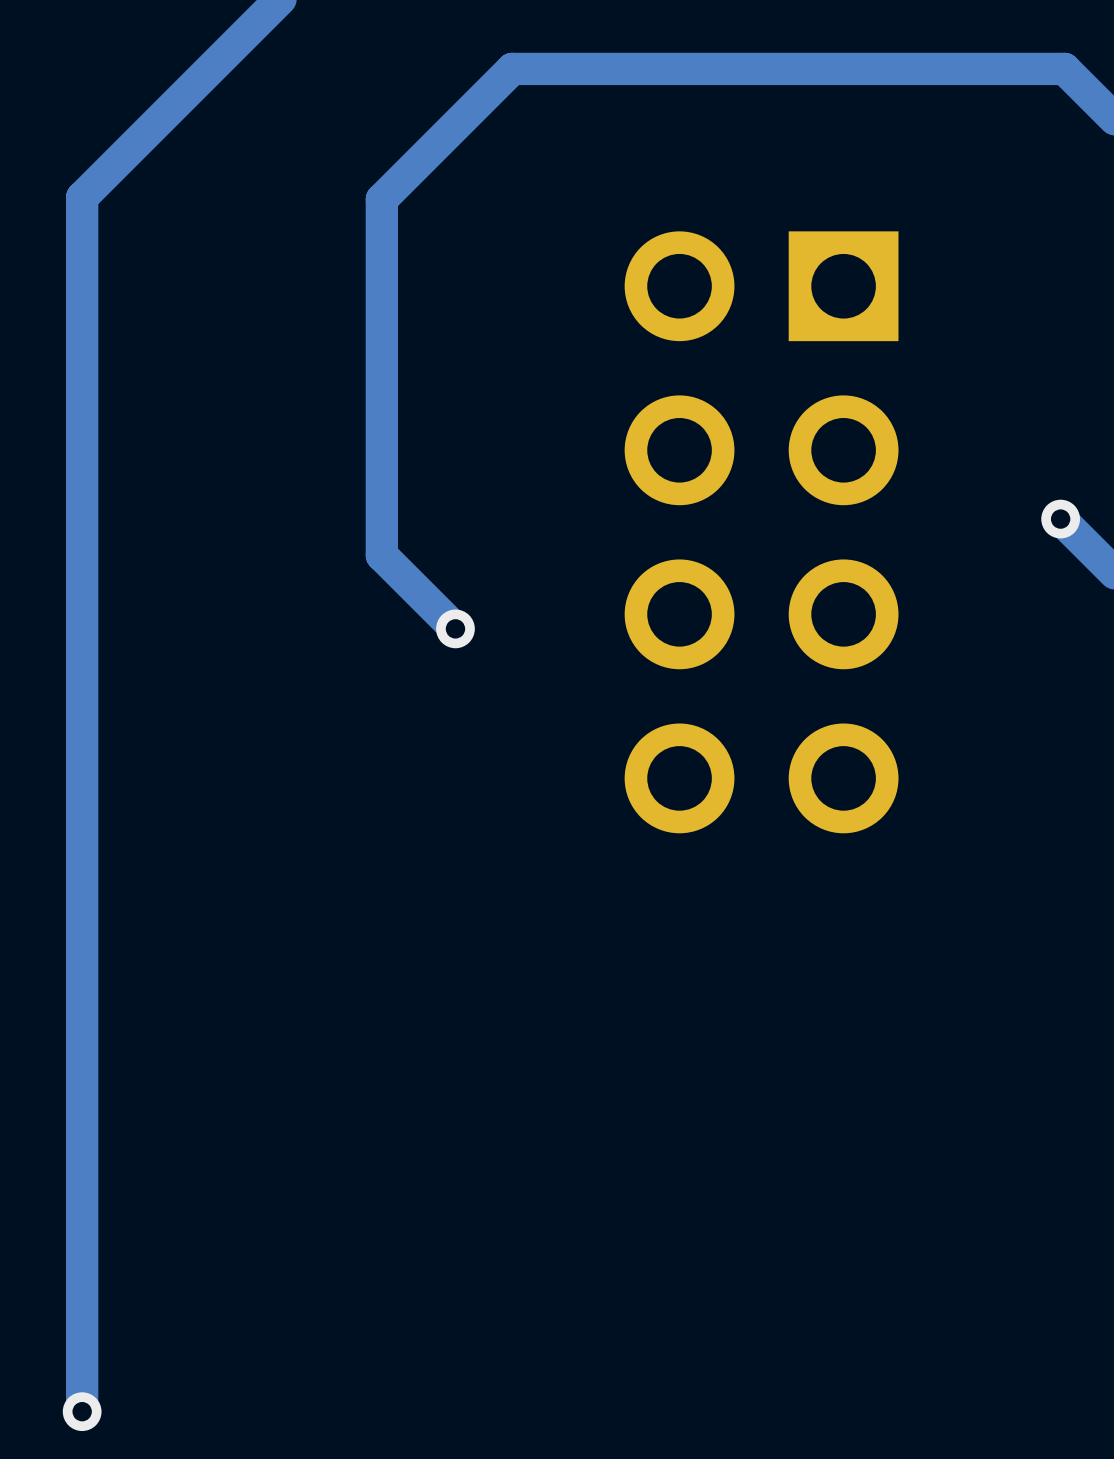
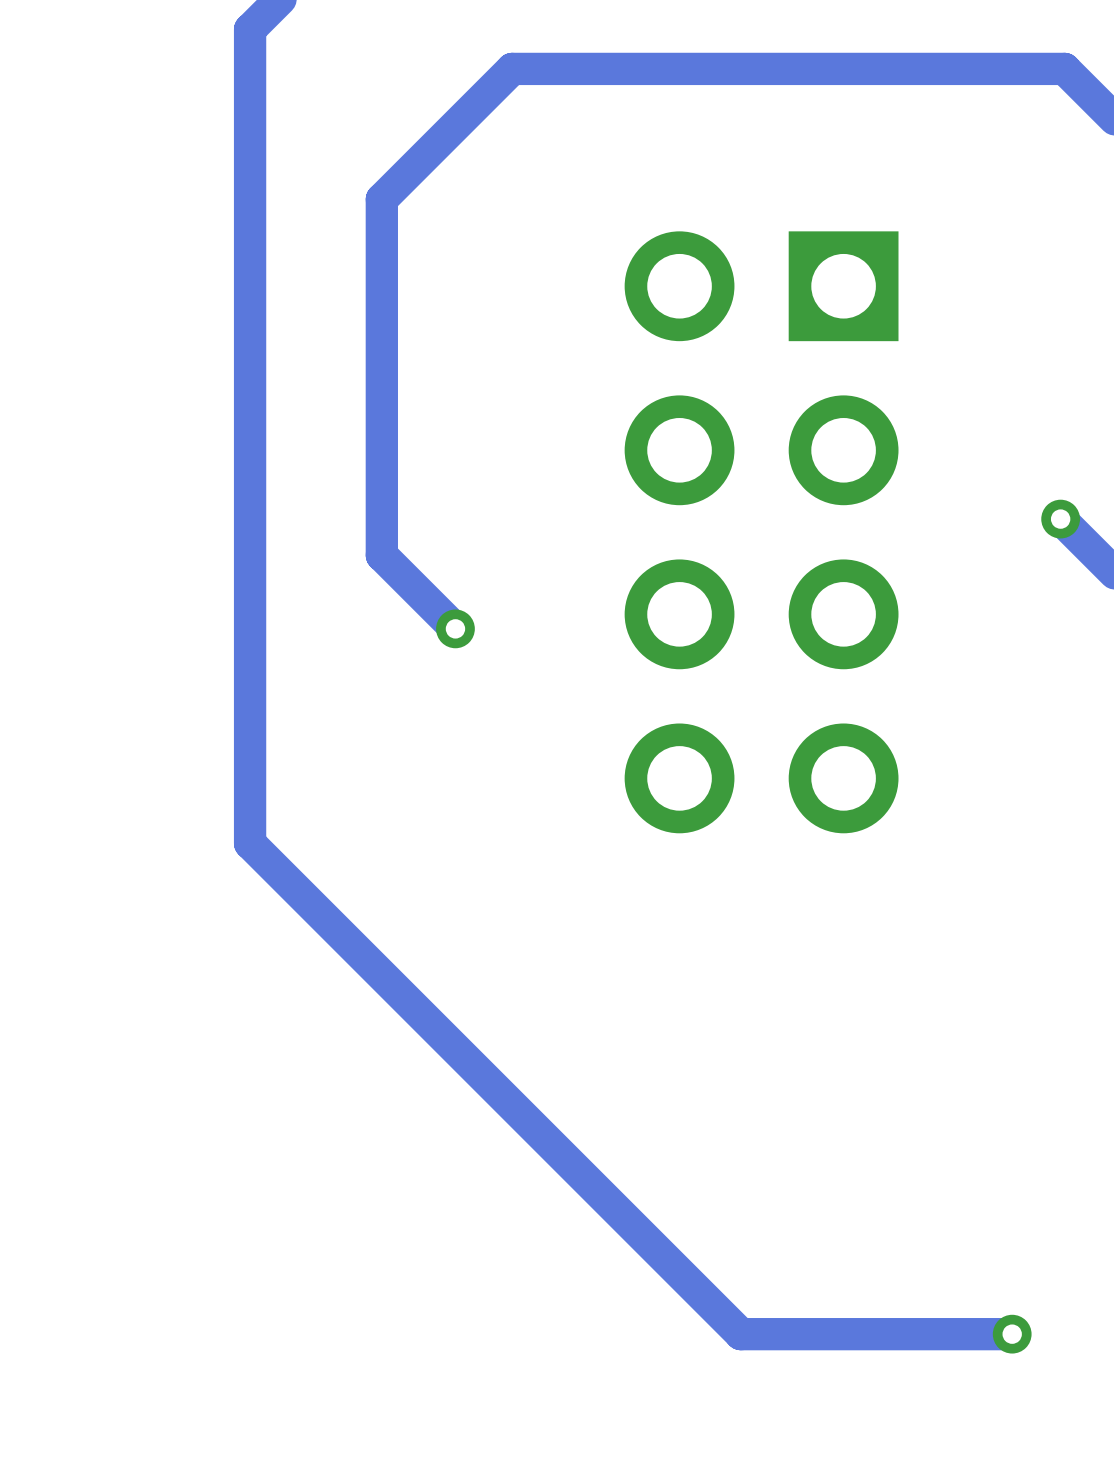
track: (250, 29) (82, 197) (82, 1411) -> (250, 29) (250, 843) (740, 1334) (1012, 1334)
via: none -> (1012, 1334)
via: (82, 1411) -> none

